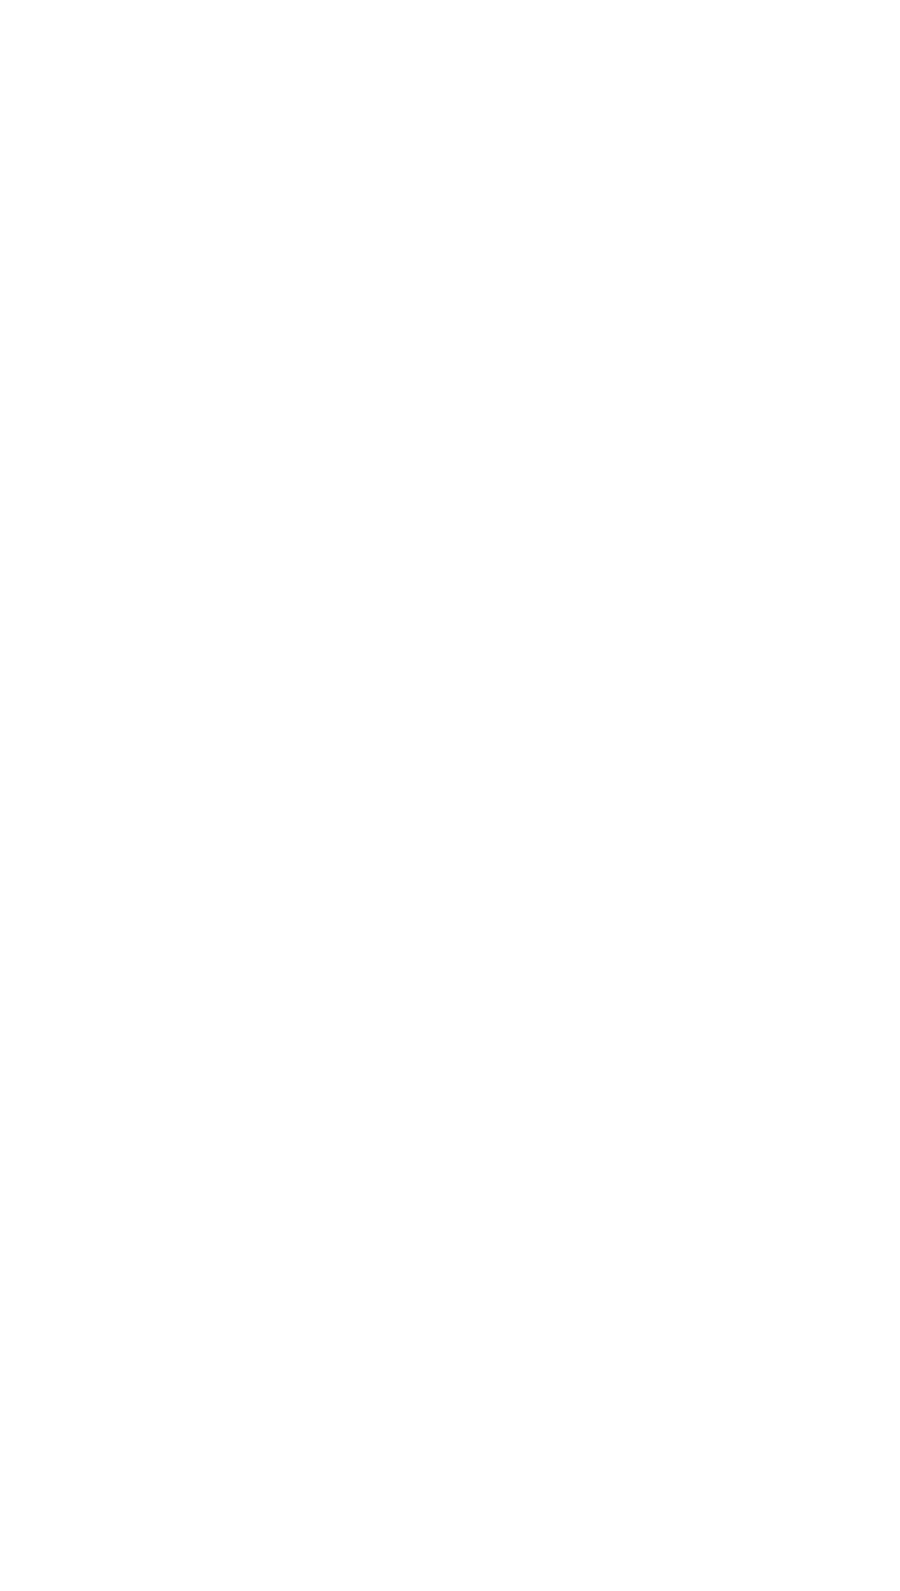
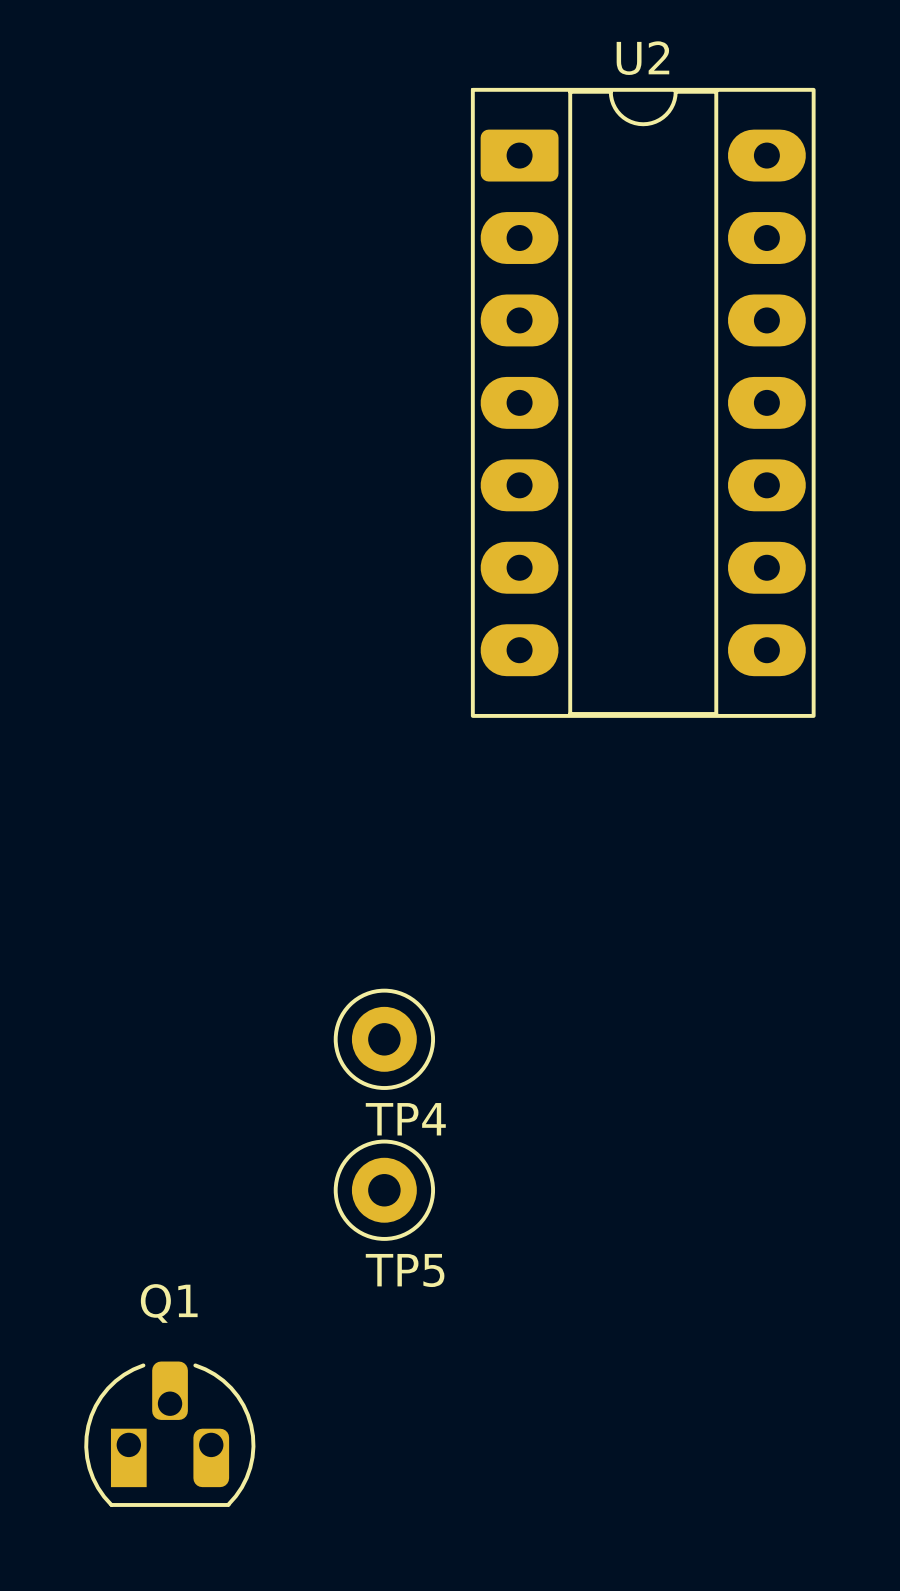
U2: none -> (643, 402)
TP4: none -> (384, 1039)
TP5: none -> (384, 1190)
Q1: none -> (169, 1434)

